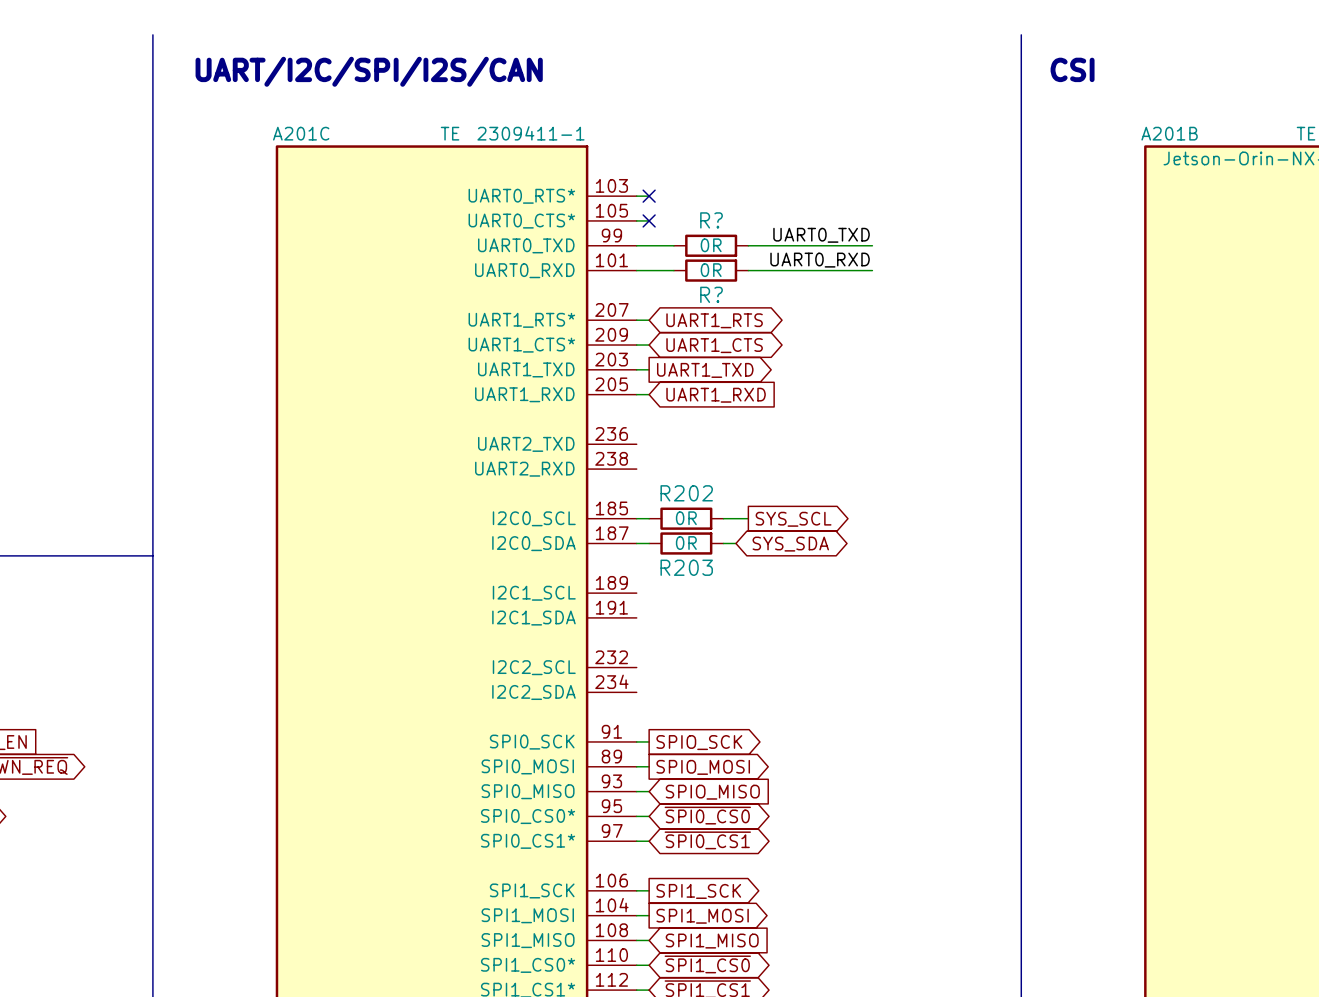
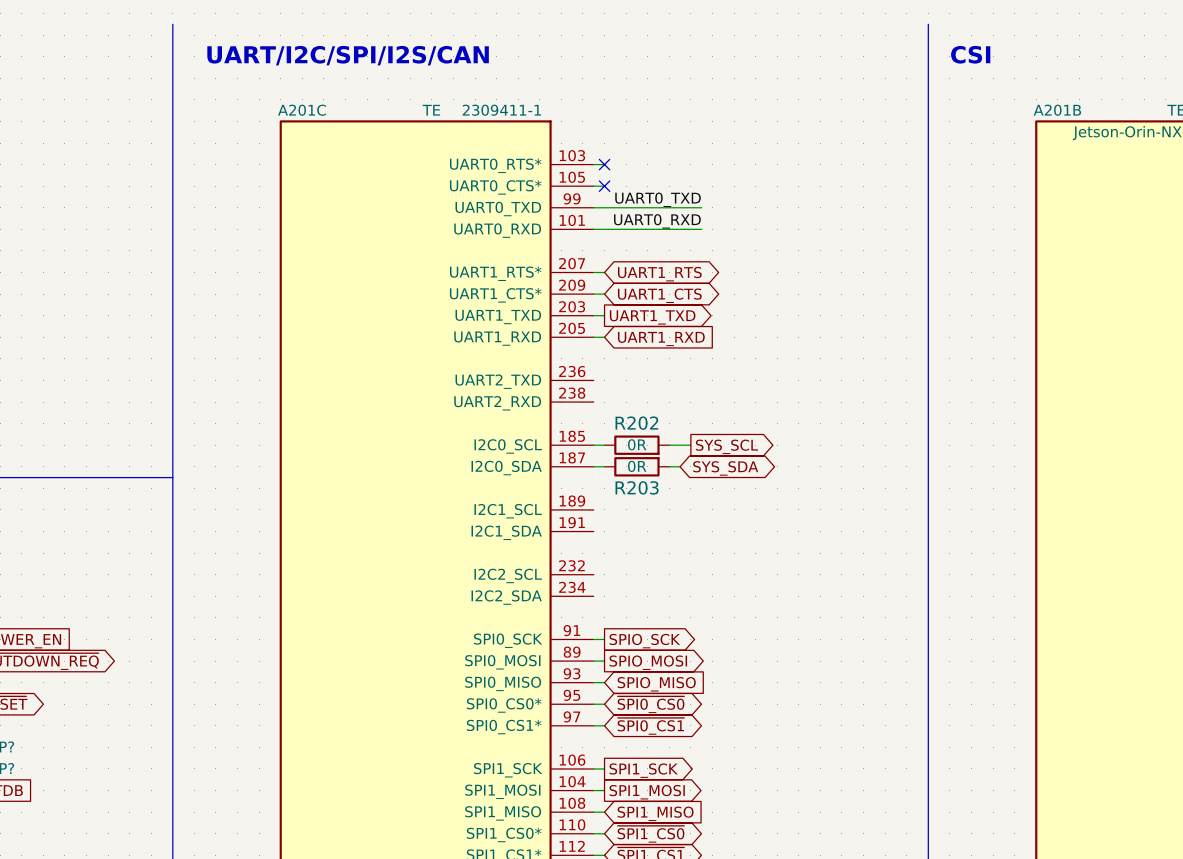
label position: UART0_TXD (821, 235) -> UART0_TXD (658, 199)
wire: none -> (626, 207) (690, 207)
R?: (711, 245) -> none
wire: (760, 245) (872, 245) -> none
label position: UART0_RXD (820, 260) -> UART0_RXD (657, 221)
wire: none -> (626, 229) (690, 229)
R?: (711, 270) -> none
wire: (760, 270) (872, 270) -> none

